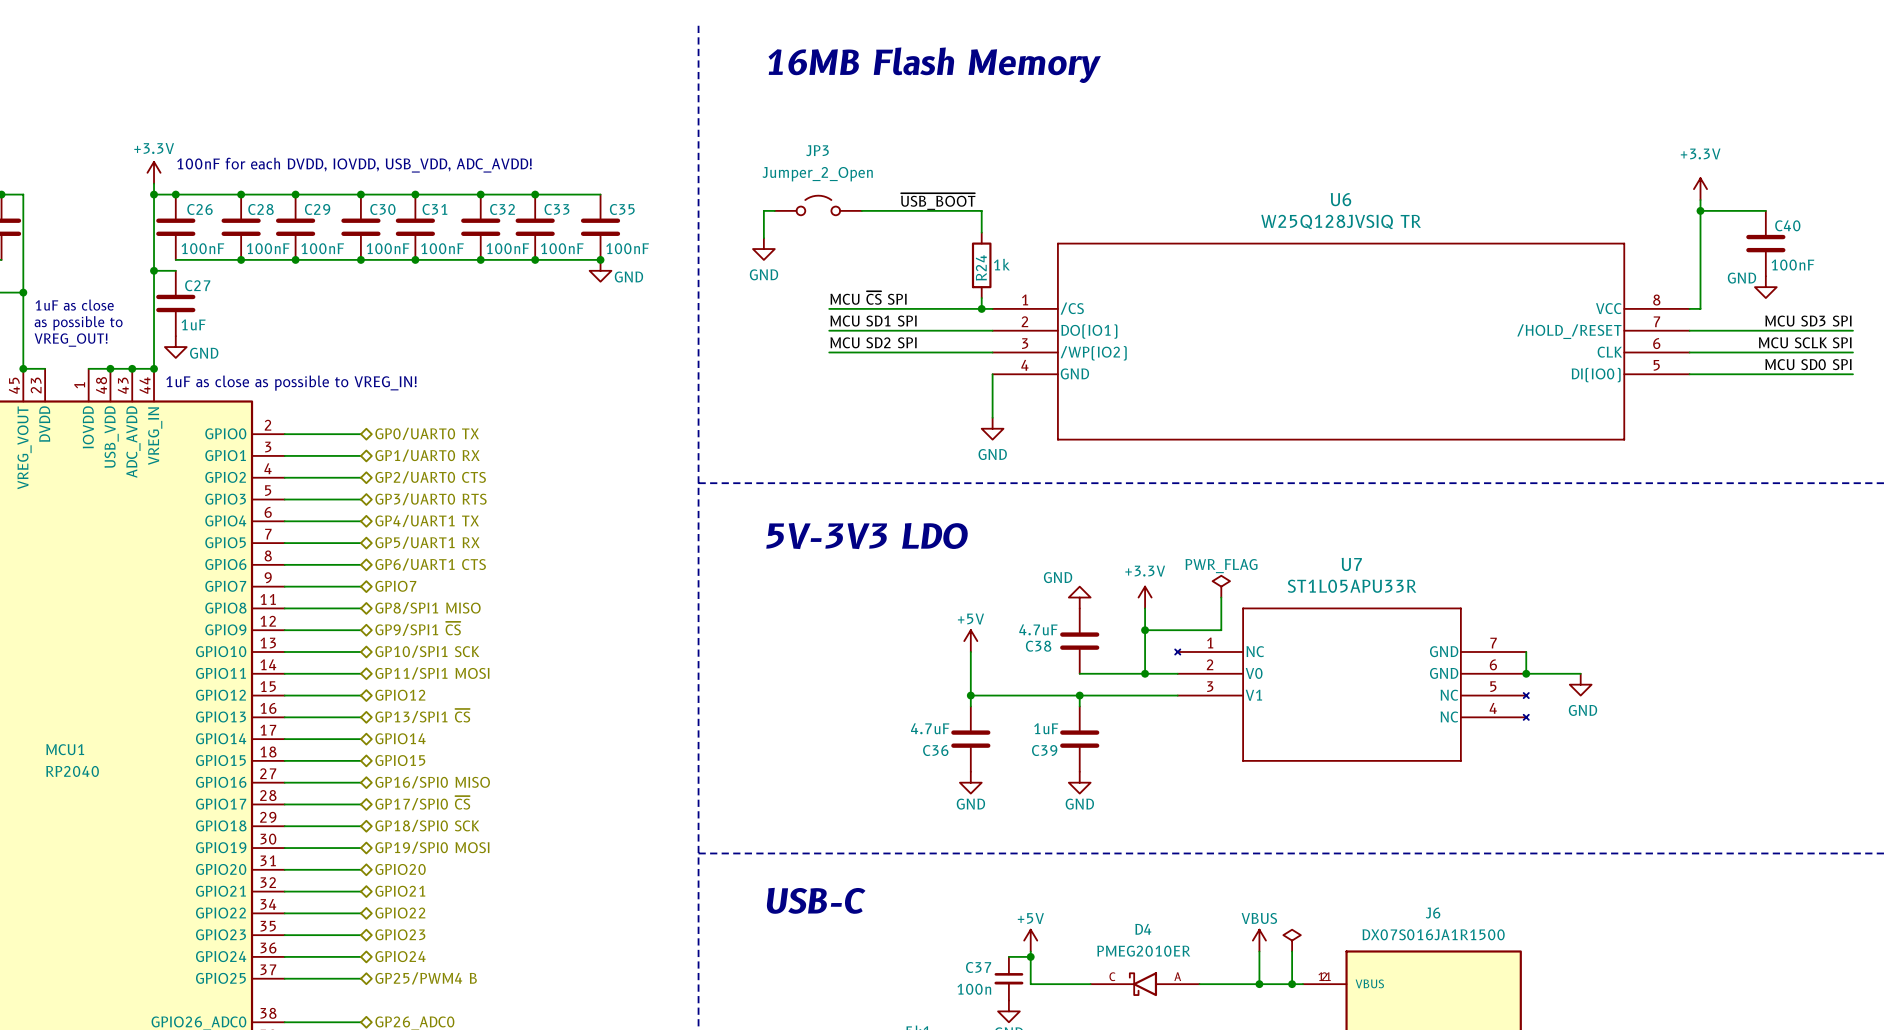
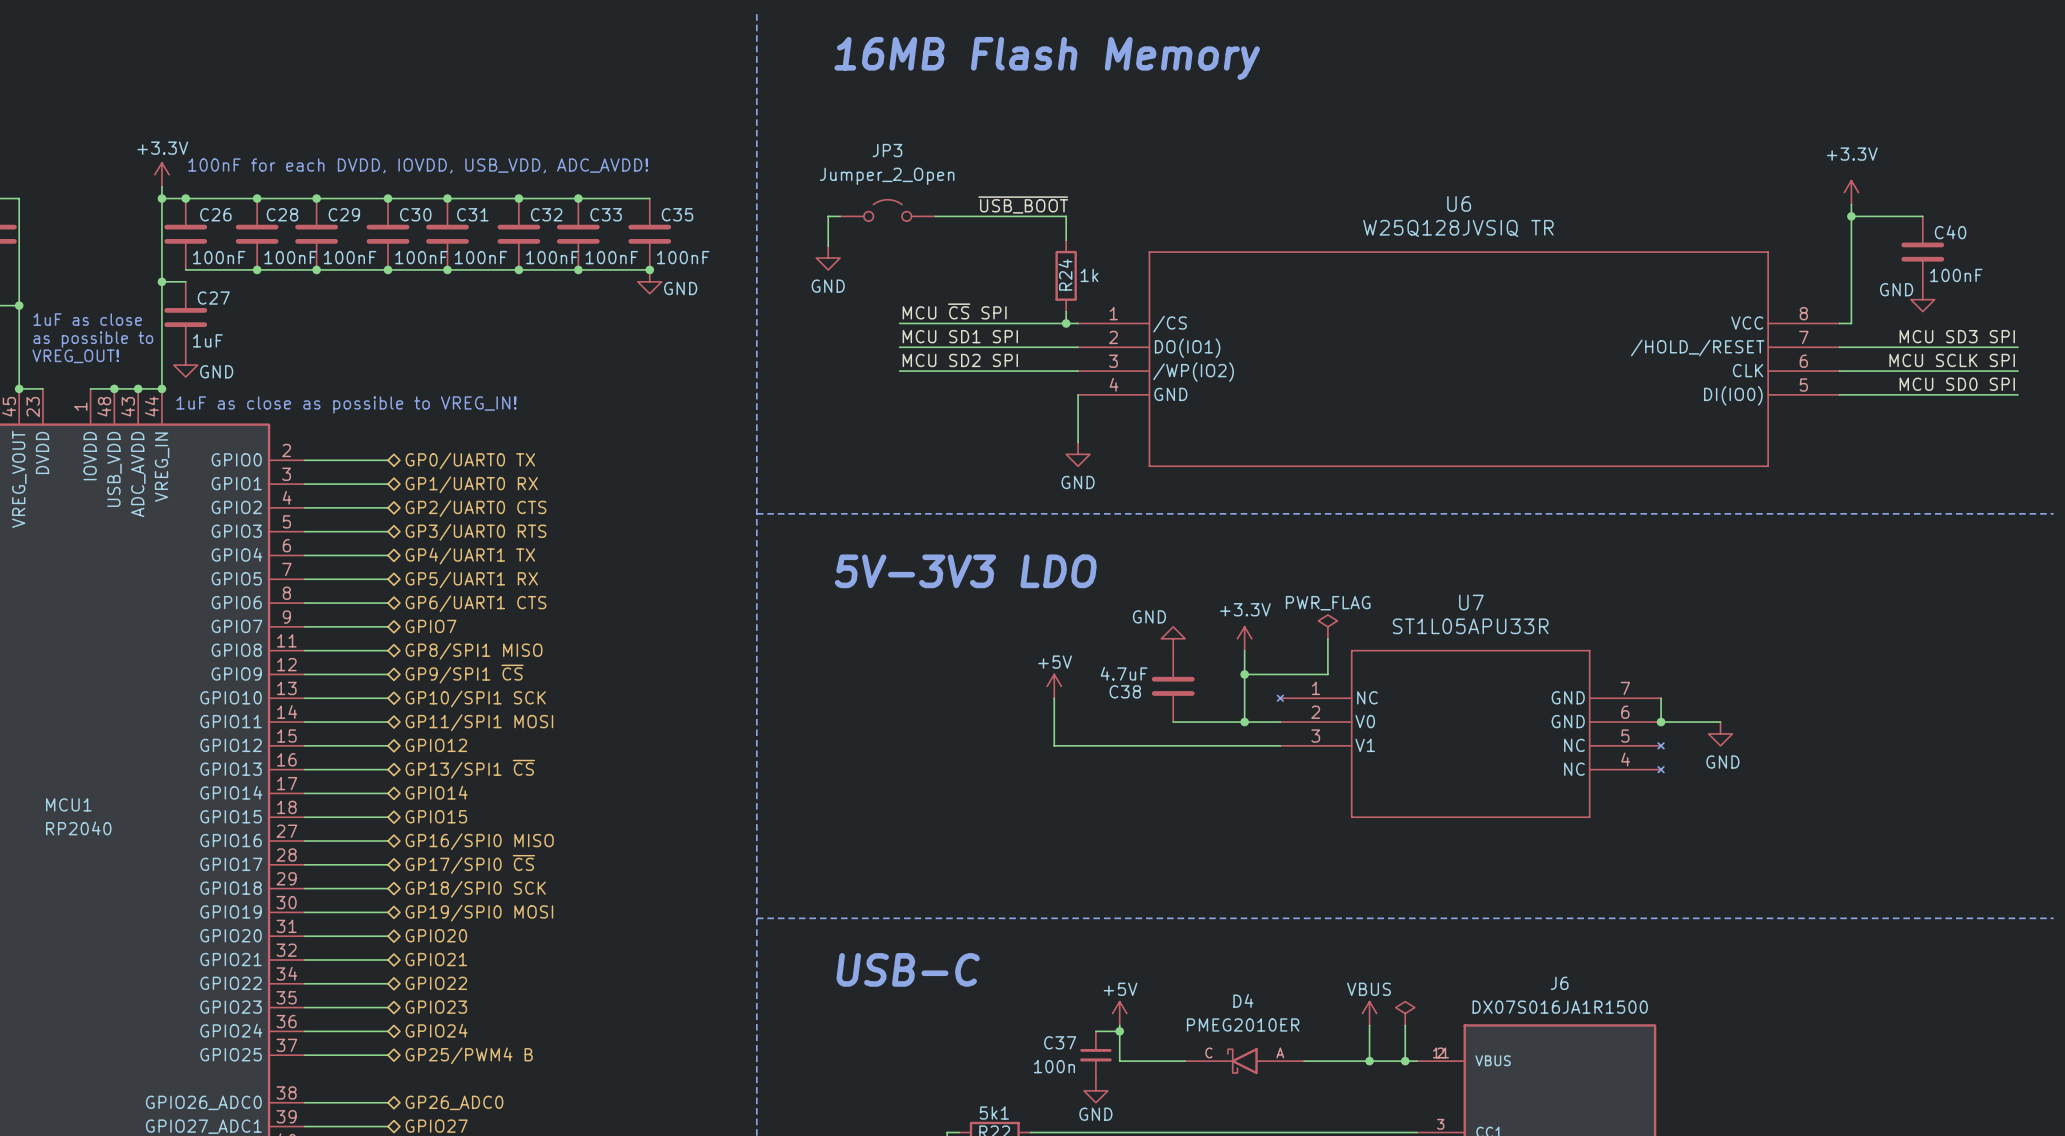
wire: (970, 695) (970, 706) -> none
junction: (970, 695) -> none
wire: (1079, 695) (1079, 706) -> none
junction: (1079, 695) -> none
C36: 4.7uF (970, 739) -> none
C39: 1uF (1079, 739) -> none
power symbol: GND (970, 782) -> none
power symbol: GND (1079, 782) -> none

